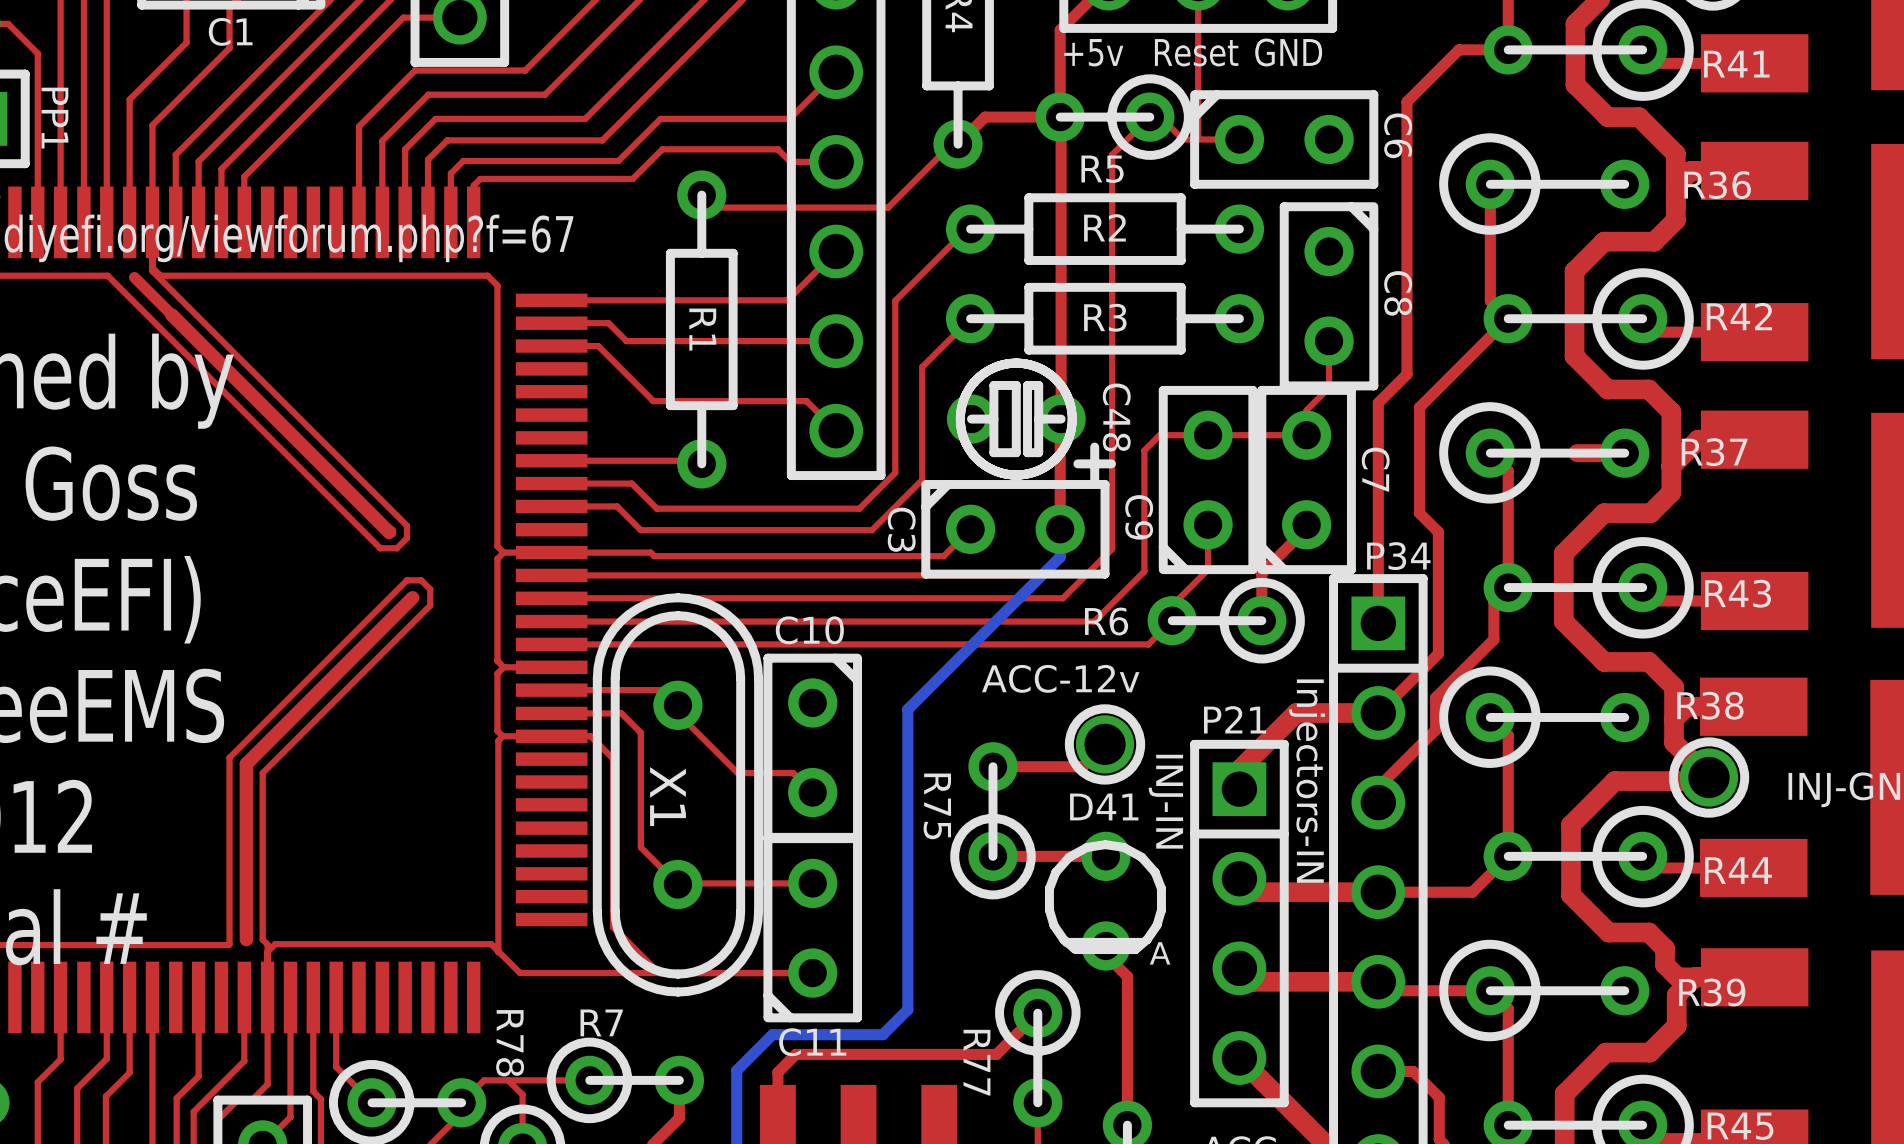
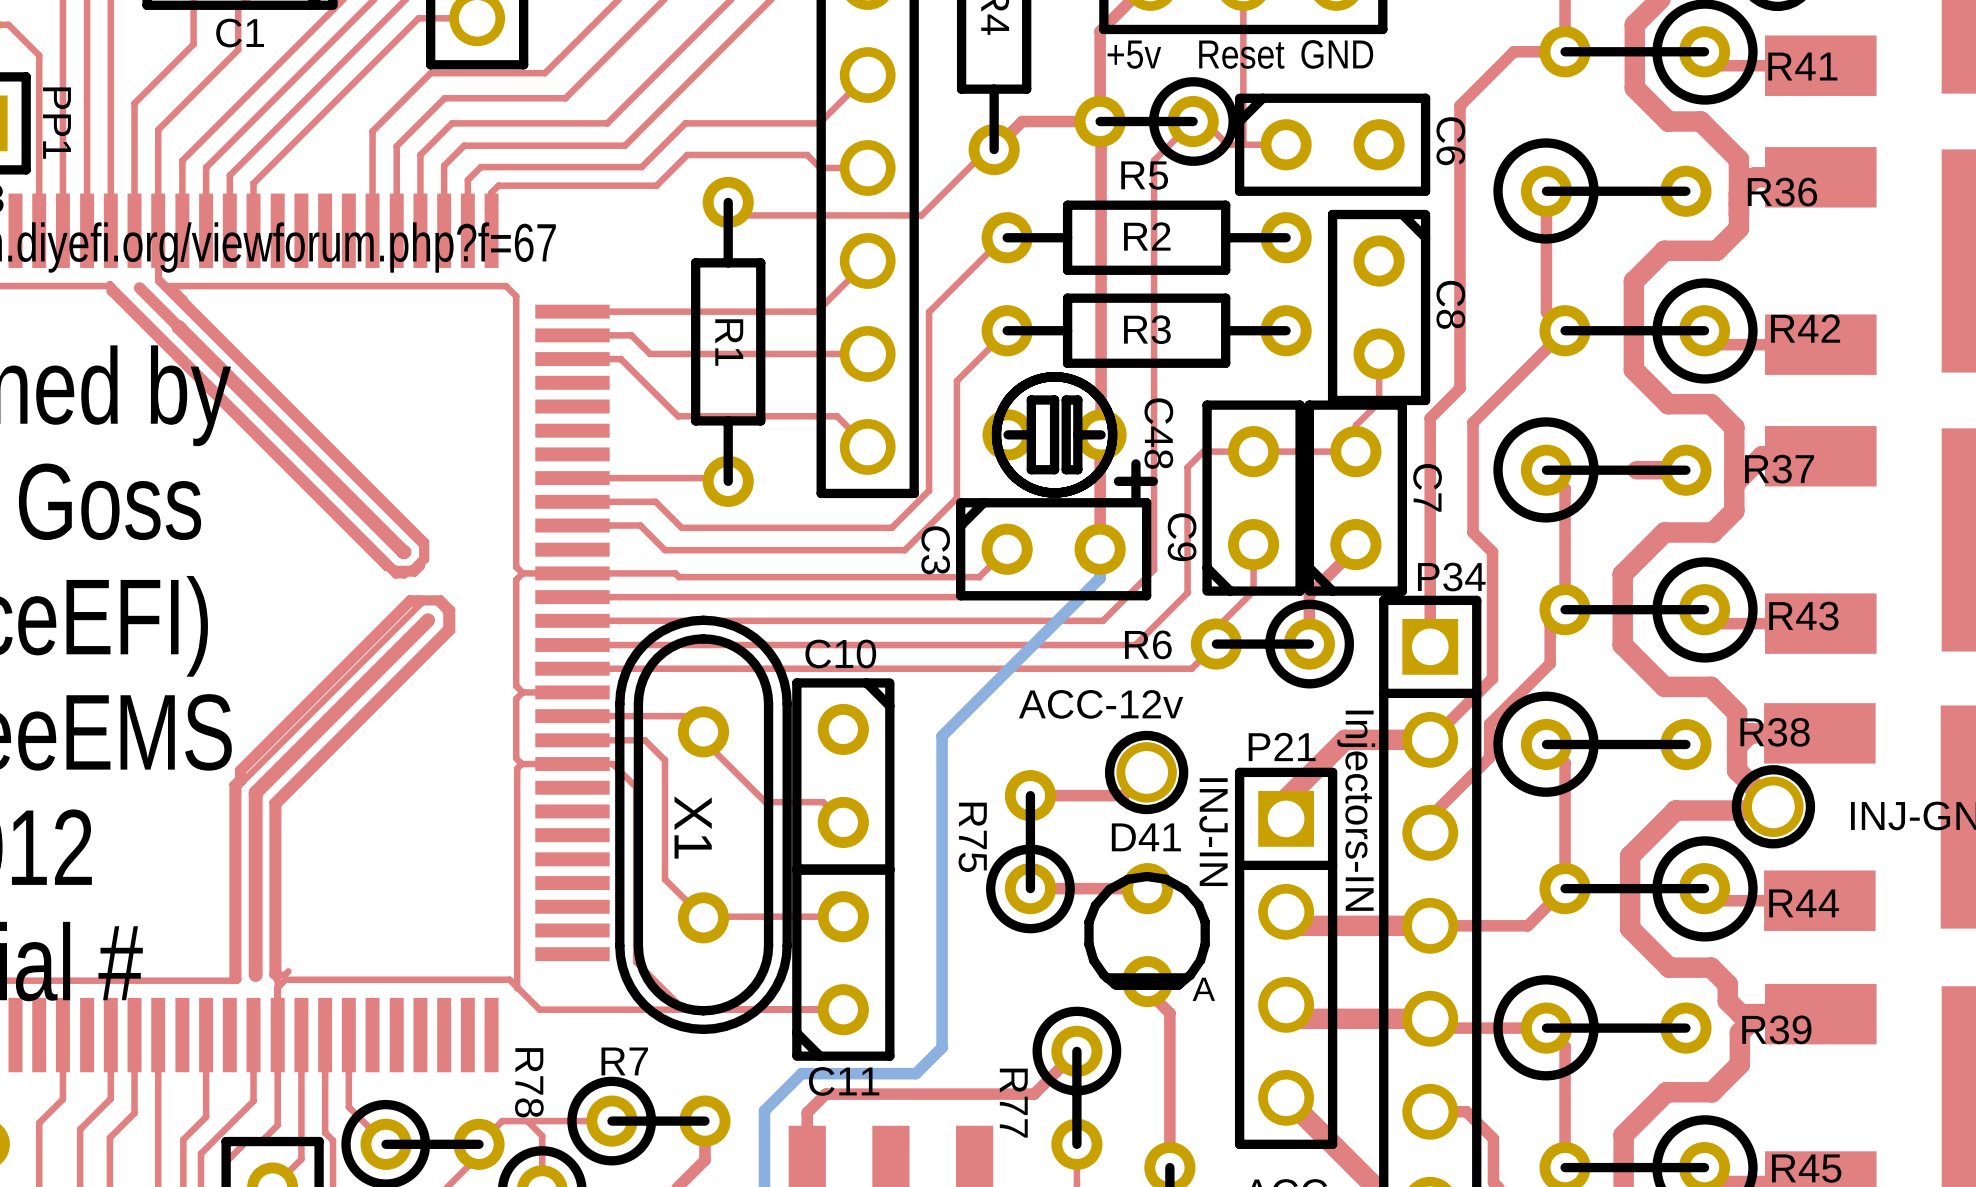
top track: none -> (171, 286) (426, 541) (426, 559) (414, 573) (395, 575) (386, 567) (109, 291) (109, 284) (111, 286)
top track: none -> (416, 603) (411, 603) (242, 771) (242, 782)
top track: none -> (288, 971) (284, 975) (278, 972) (278, 804) (452, 631) (452, 609) (440, 598) (409, 598) (238, 769) (238, 778) (232, 784) (232, 980)

